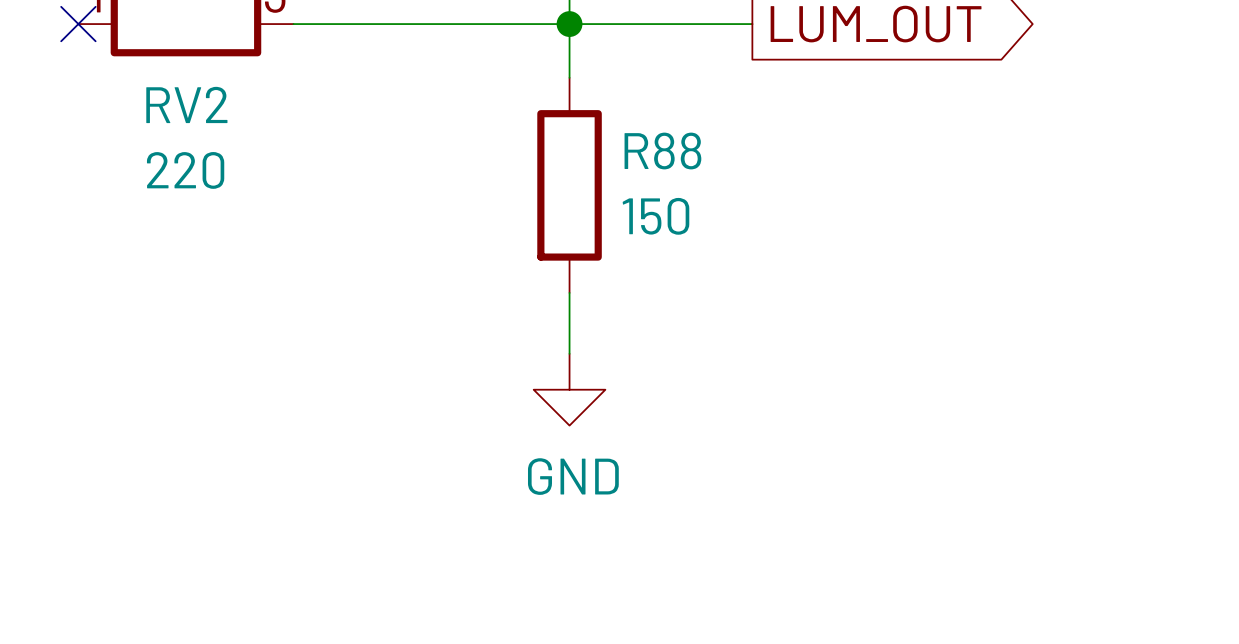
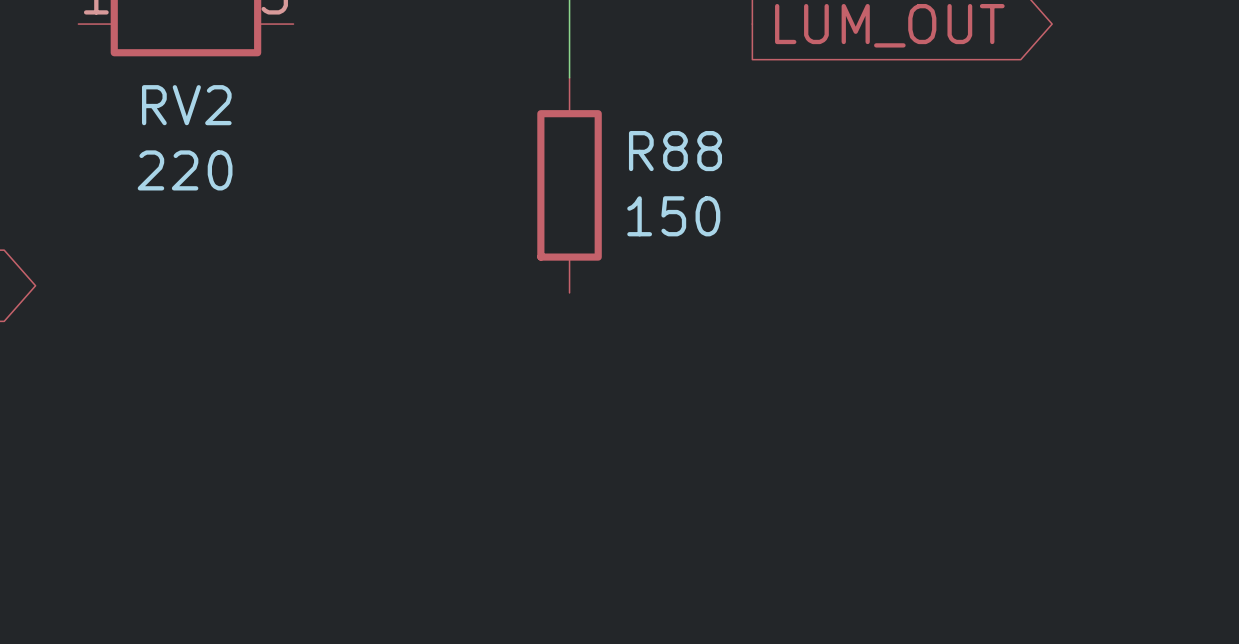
no-connect mark: (78, 24) -> none
wire: (293, 24) (752, 24) -> none
junction: (569, 24) -> none
wire: (569, 292) (569, 353) -> none
power symbol: GND (569, 389) -> none

